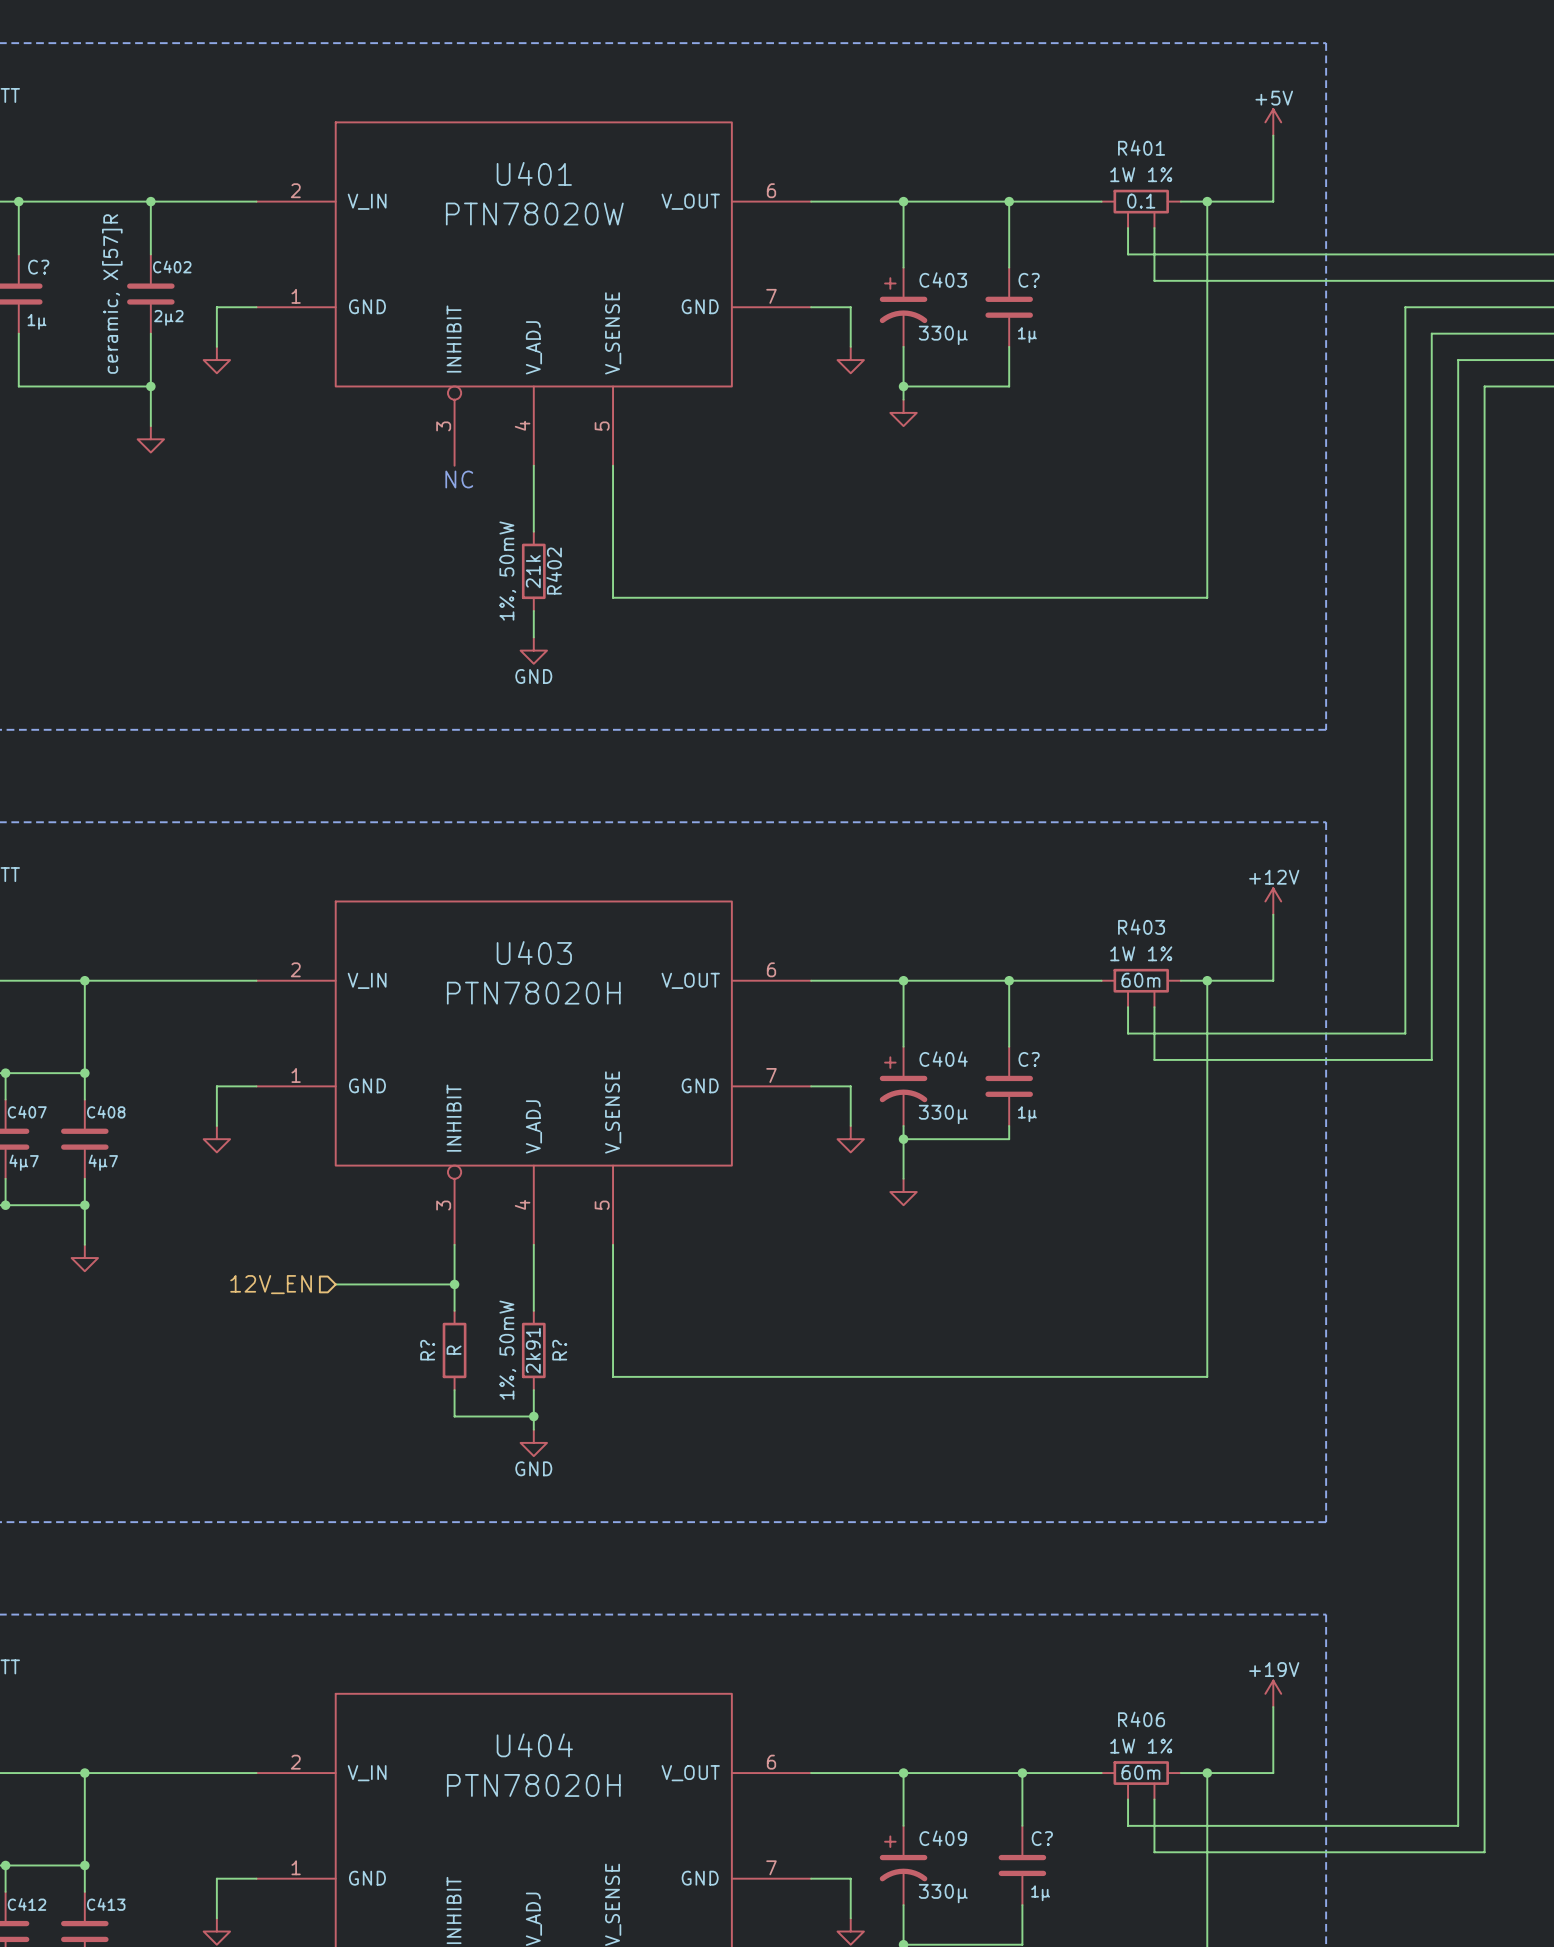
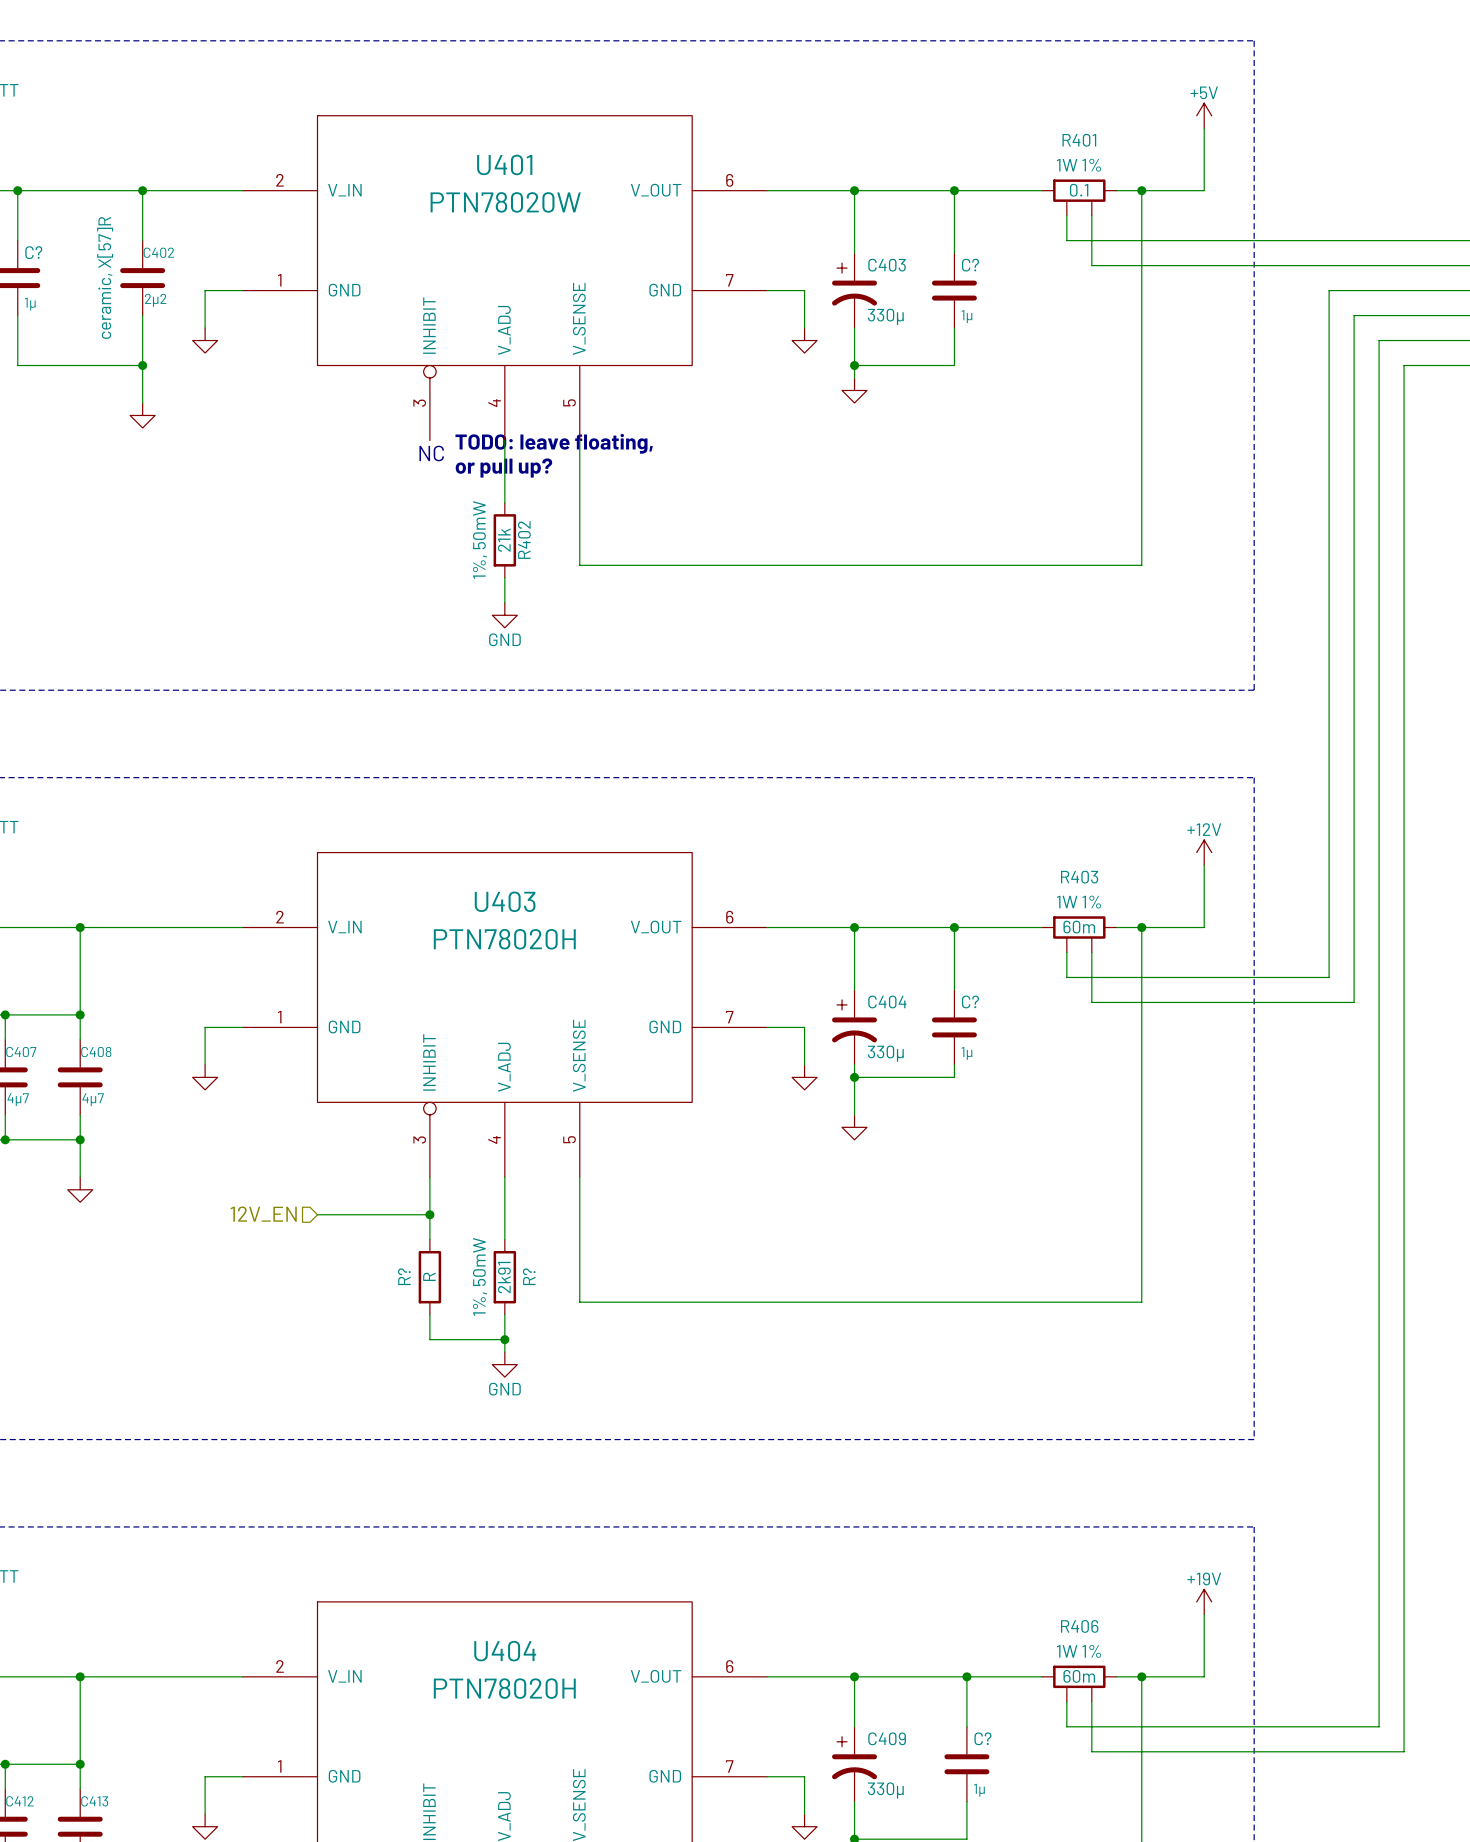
text: none -> TODO: leave floating, (554, 443)
text: none -> or pull up? (503, 468)

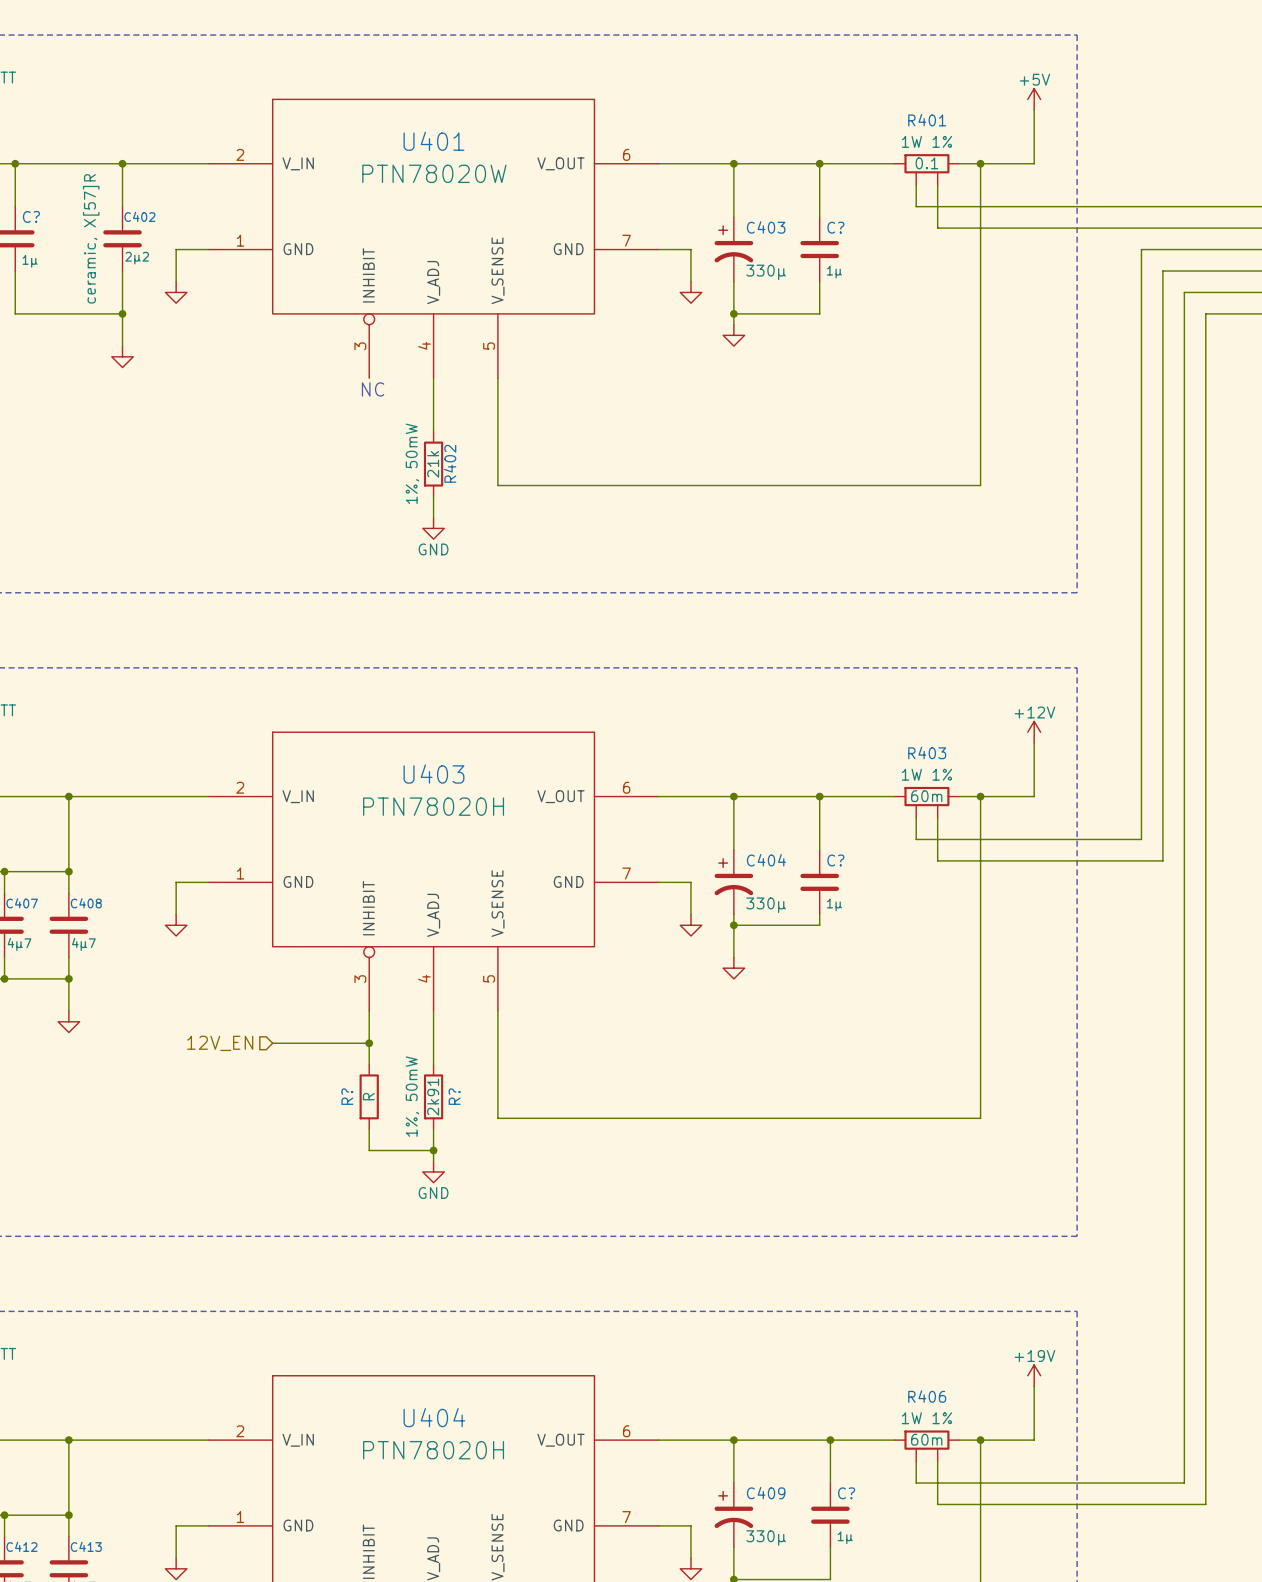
text: TODO: leave floating, (554, 443) -> none
text: or pull up? (503, 468) -> none

